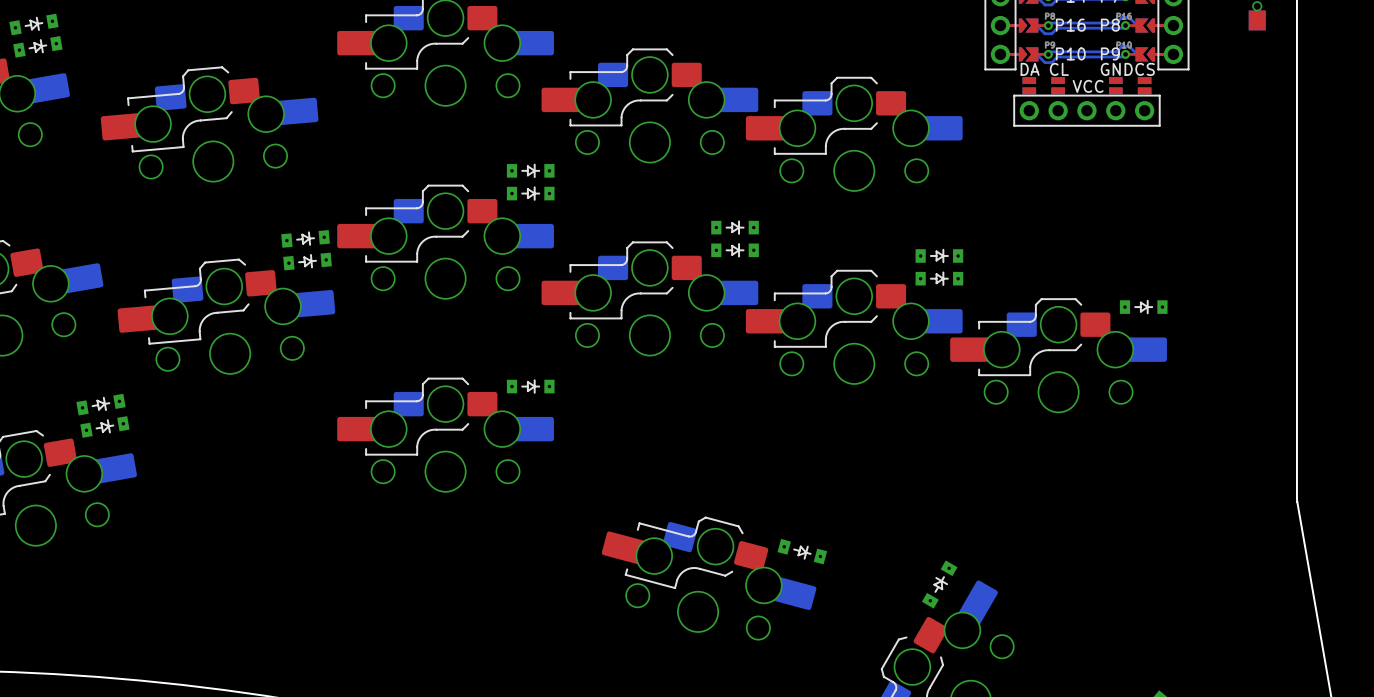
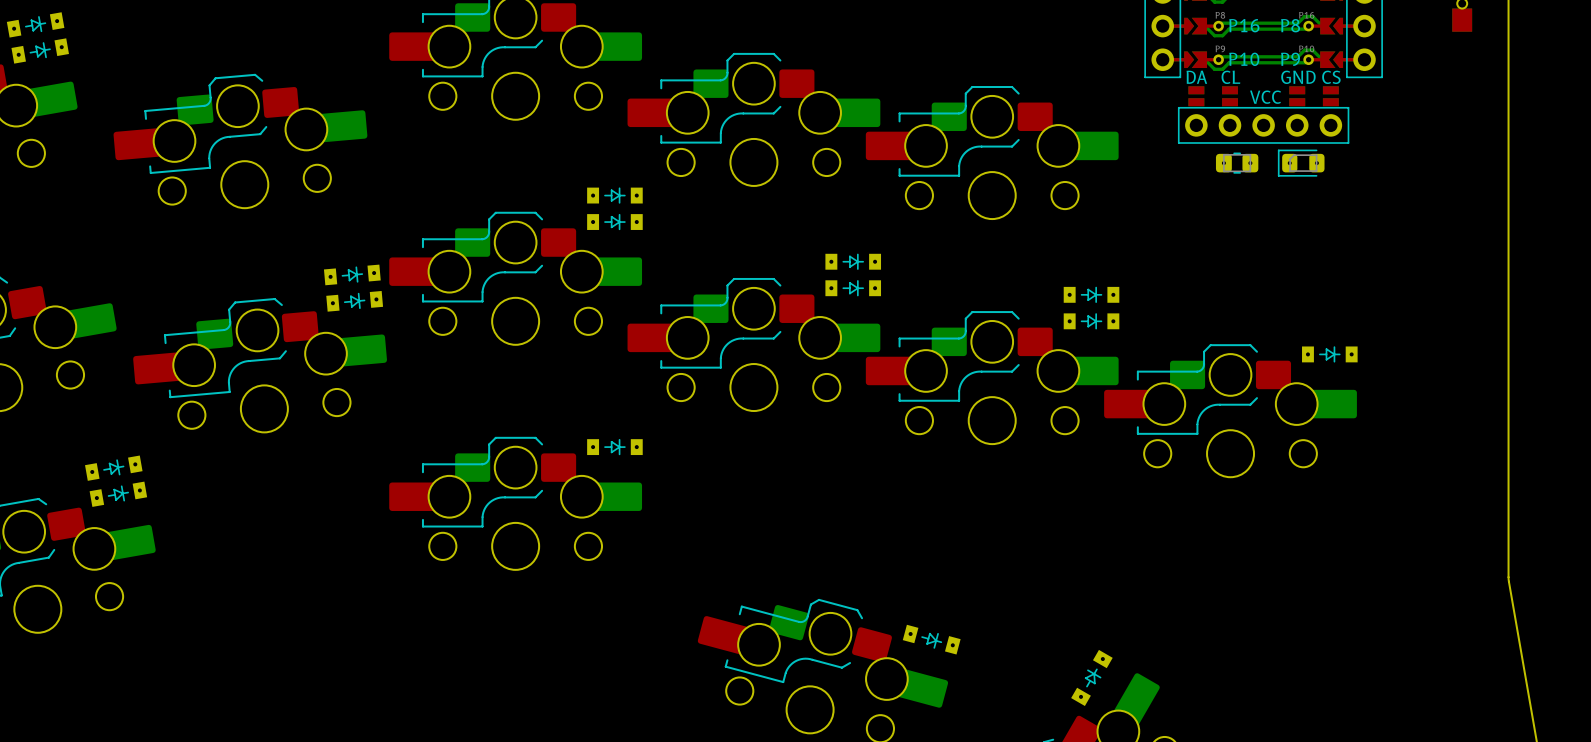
part: none -> (1237, 163)
part: none -> (1301, 163)

